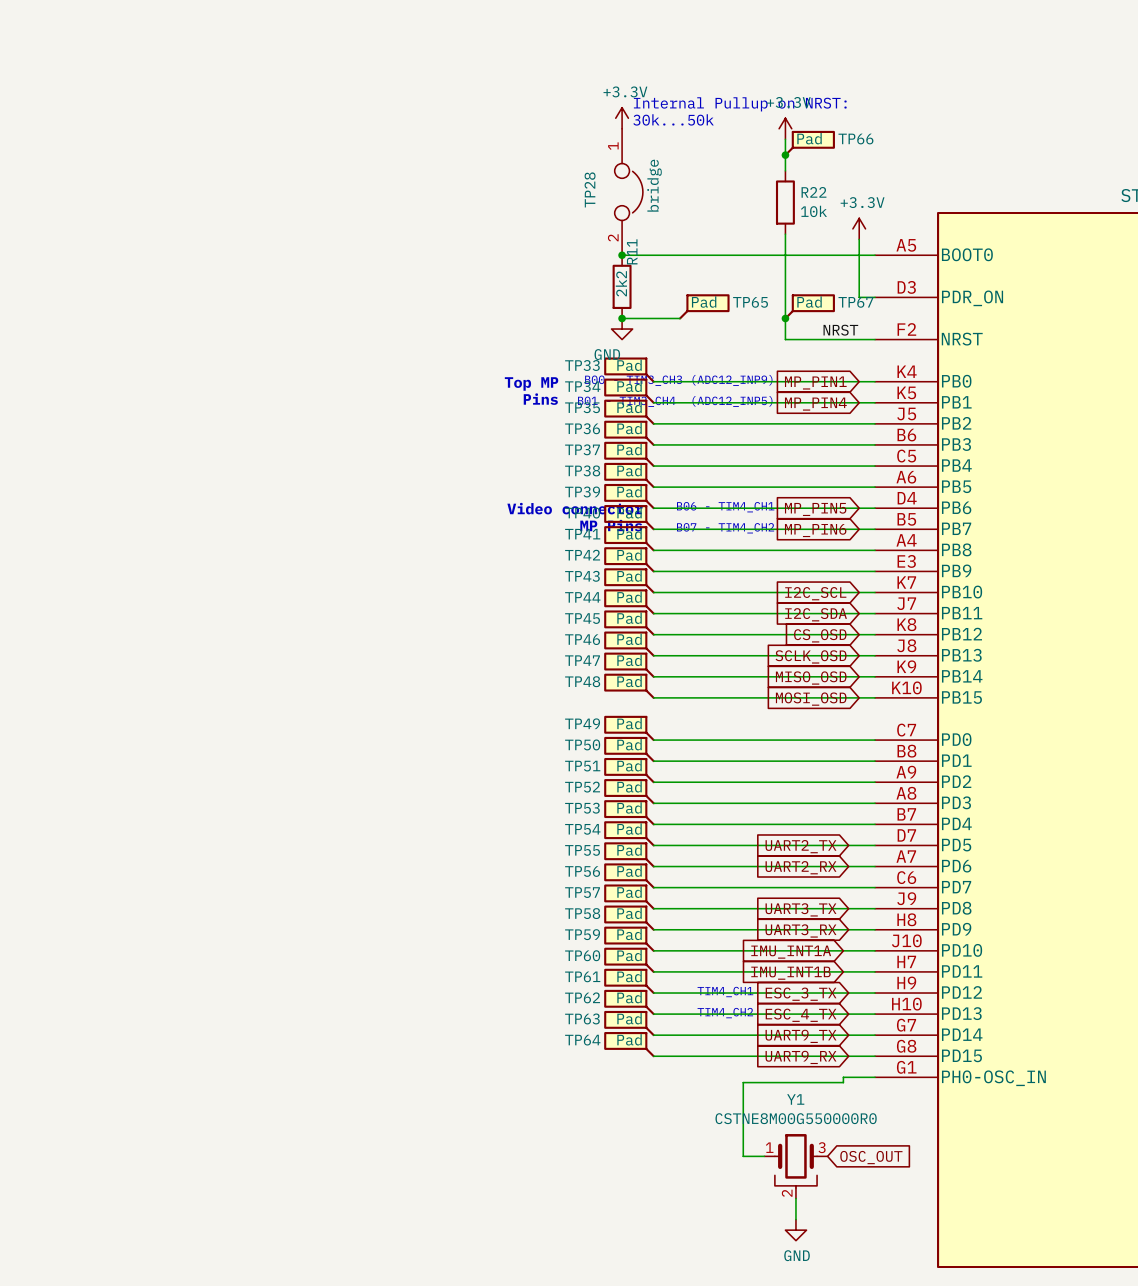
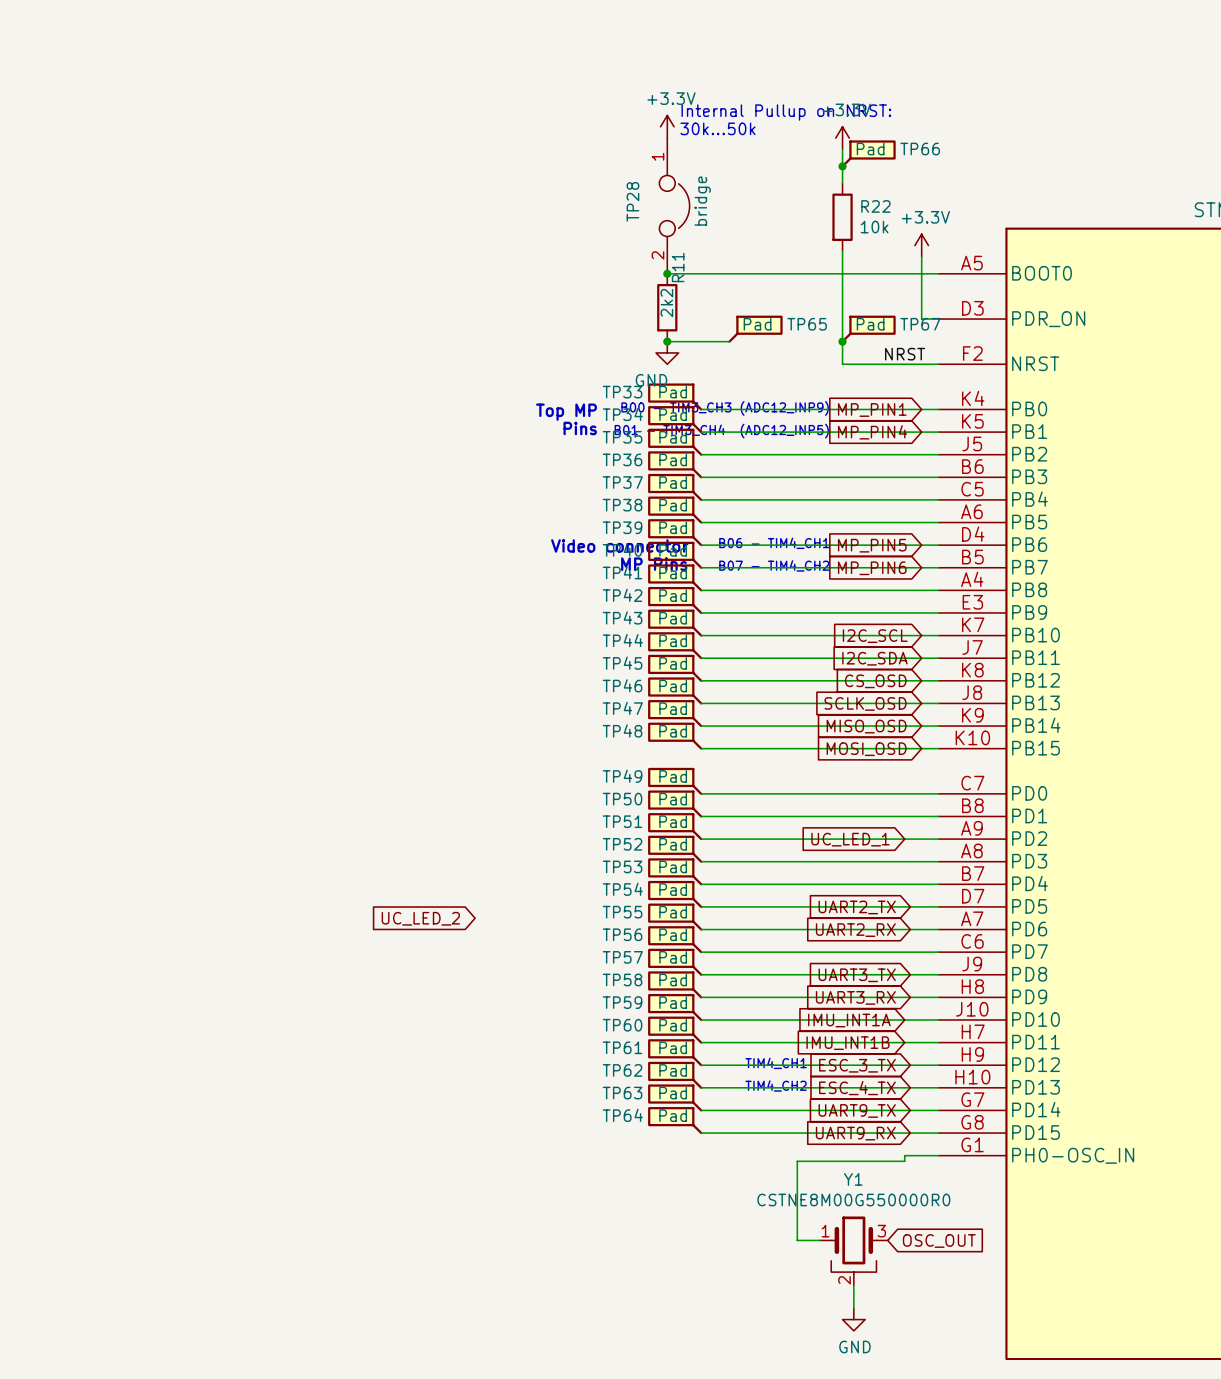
global label: none -> UC_LED_1 (850, 839)
global label: none -> UC_LED_2 (420, 918)

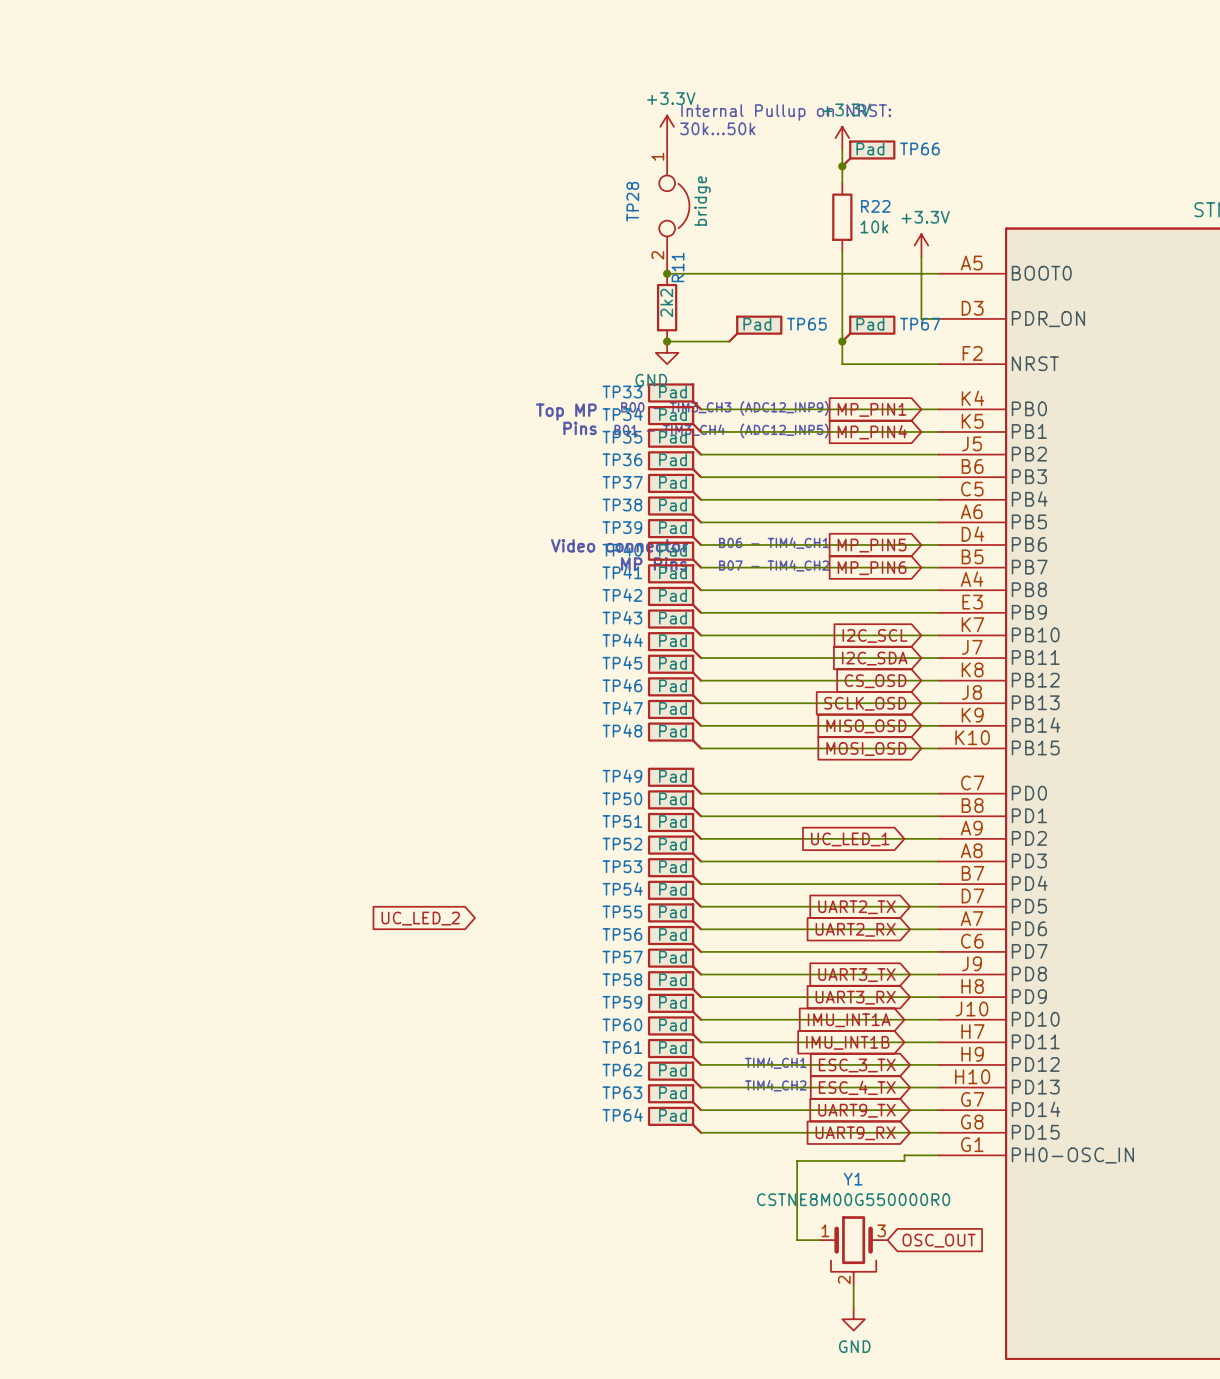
label: NRST (905, 354) -> none

